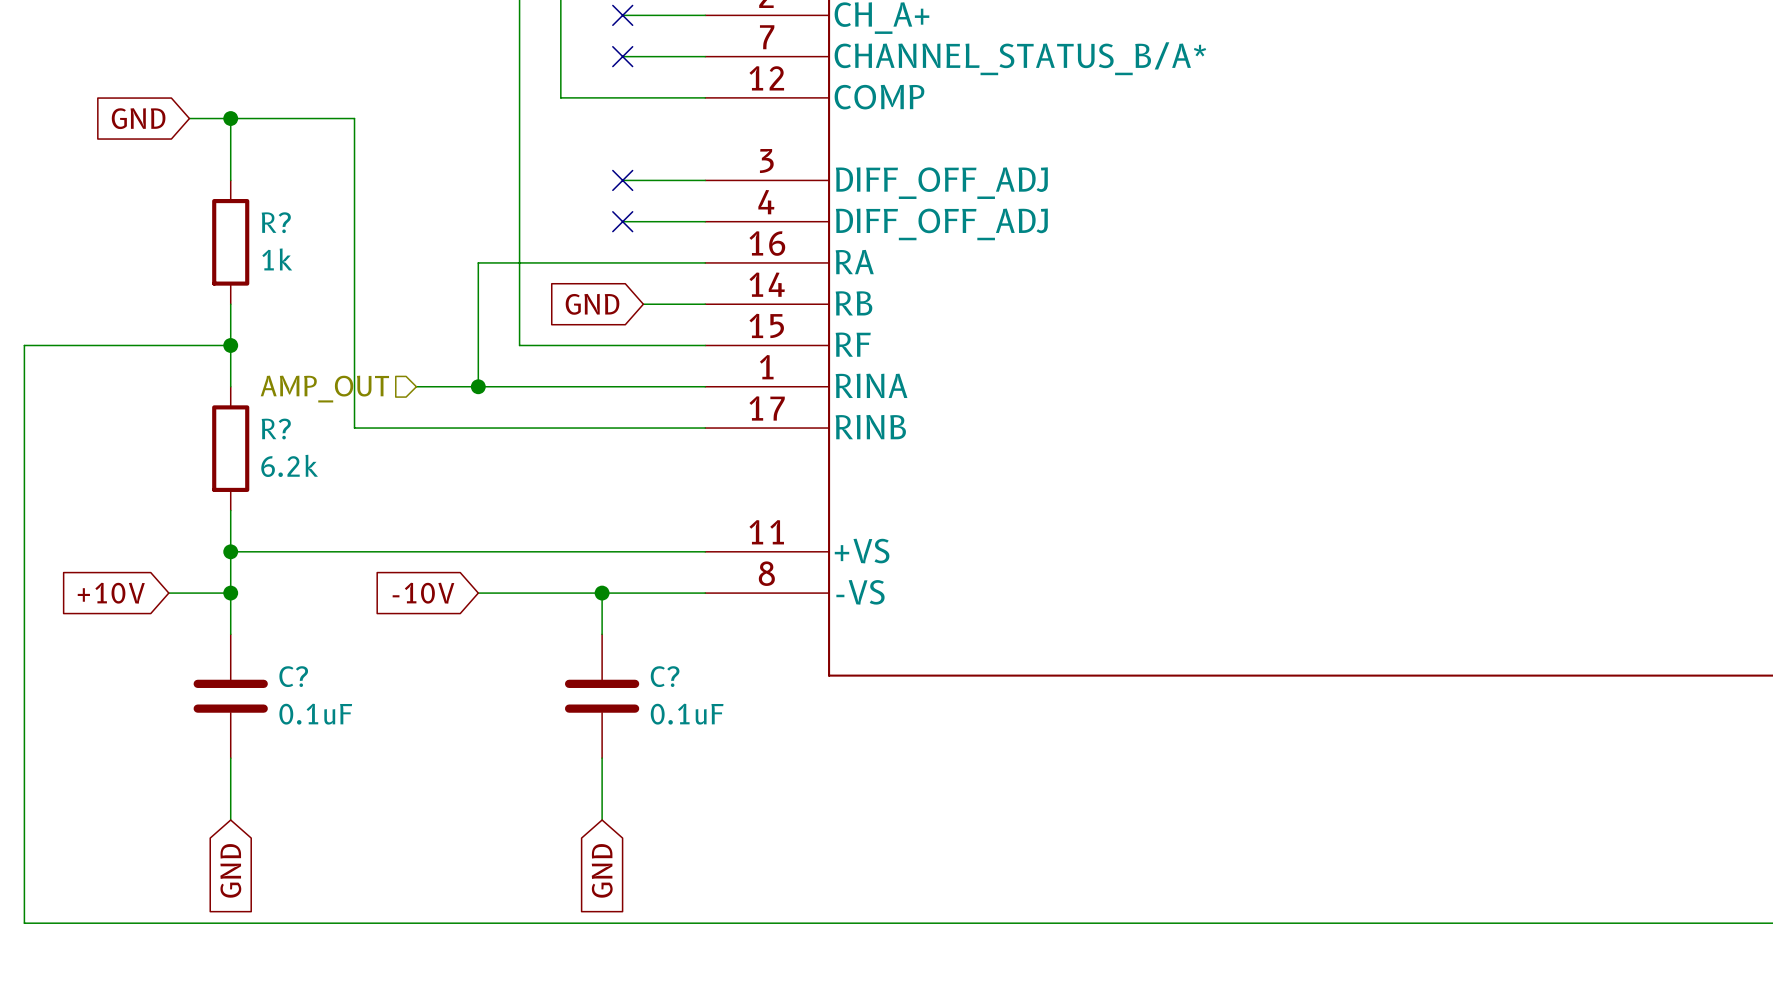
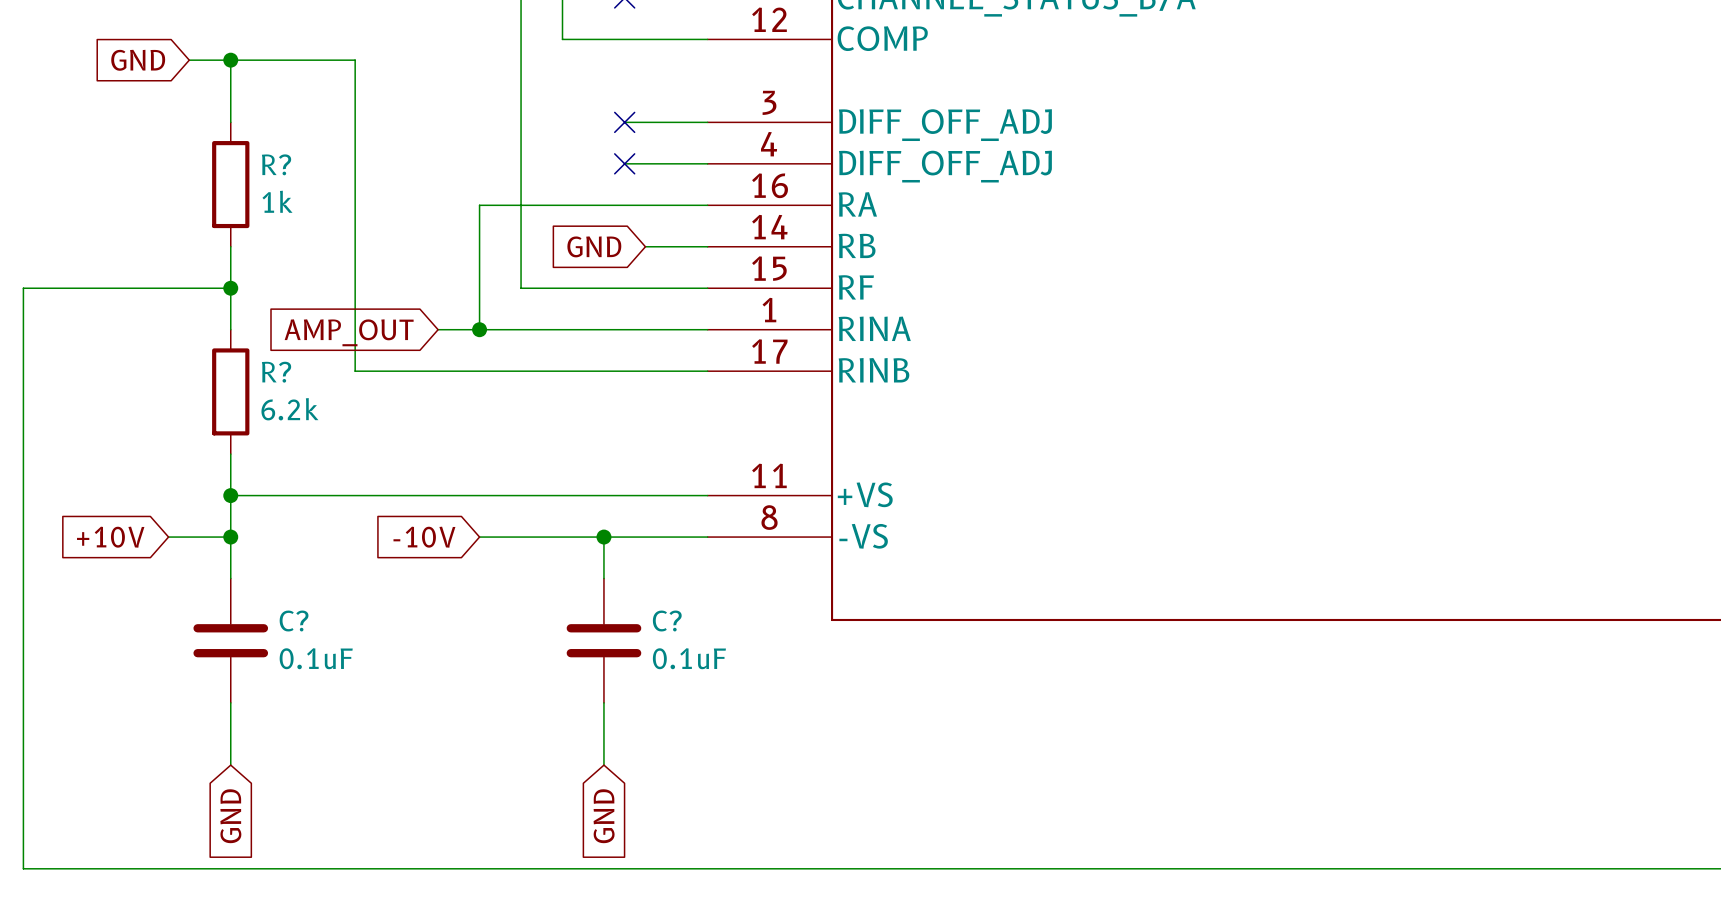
wire: (416, 386) (437, 386) -> none
hierarchical label: AMP_OUT (324, 389) -> none
global label: none -> AMP_OUT (349, 332)

